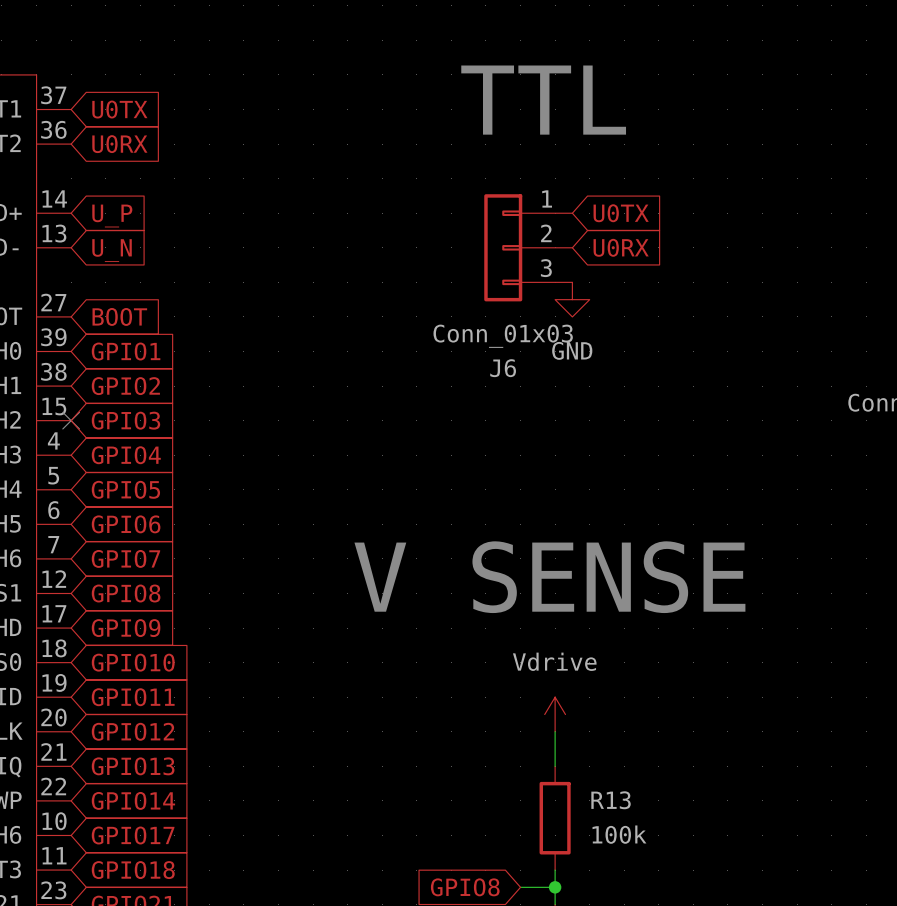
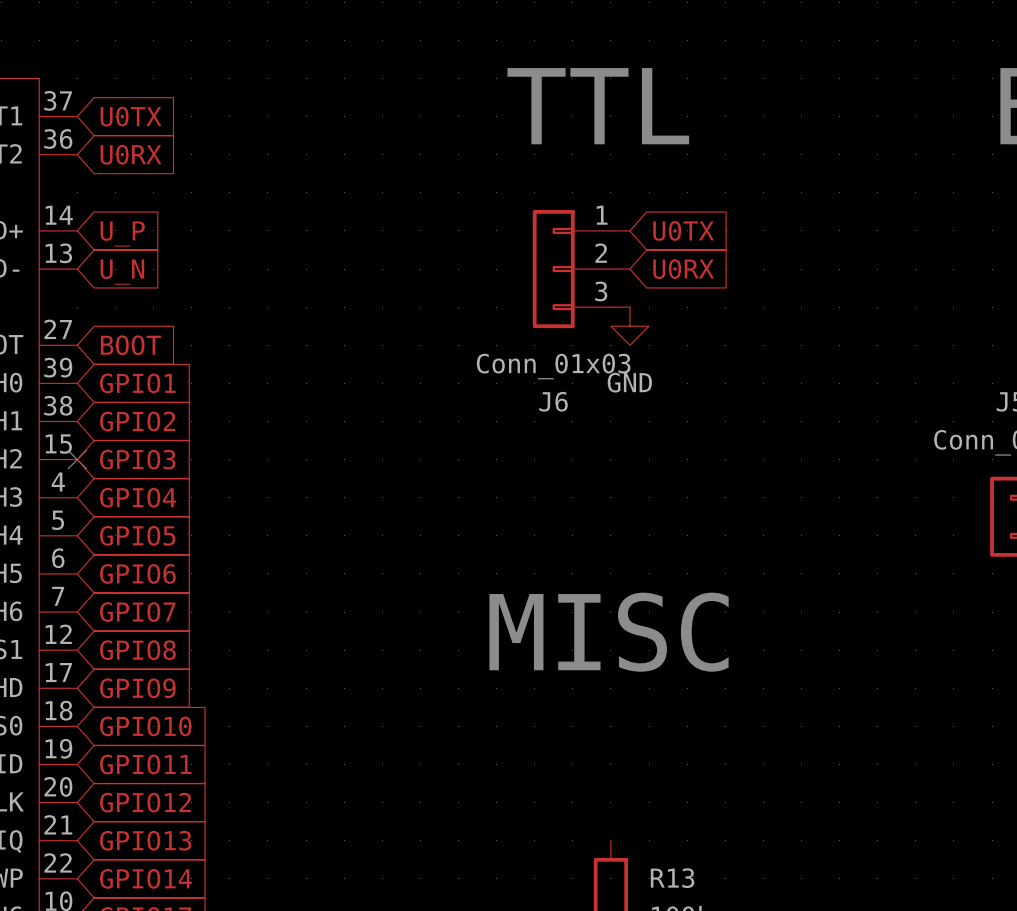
text: V SENSE (549, 577) -> MISC (609, 632)
power symbol: Vdrive (555, 714) -> none
wire: (555, 731) (555, 766) -> none

